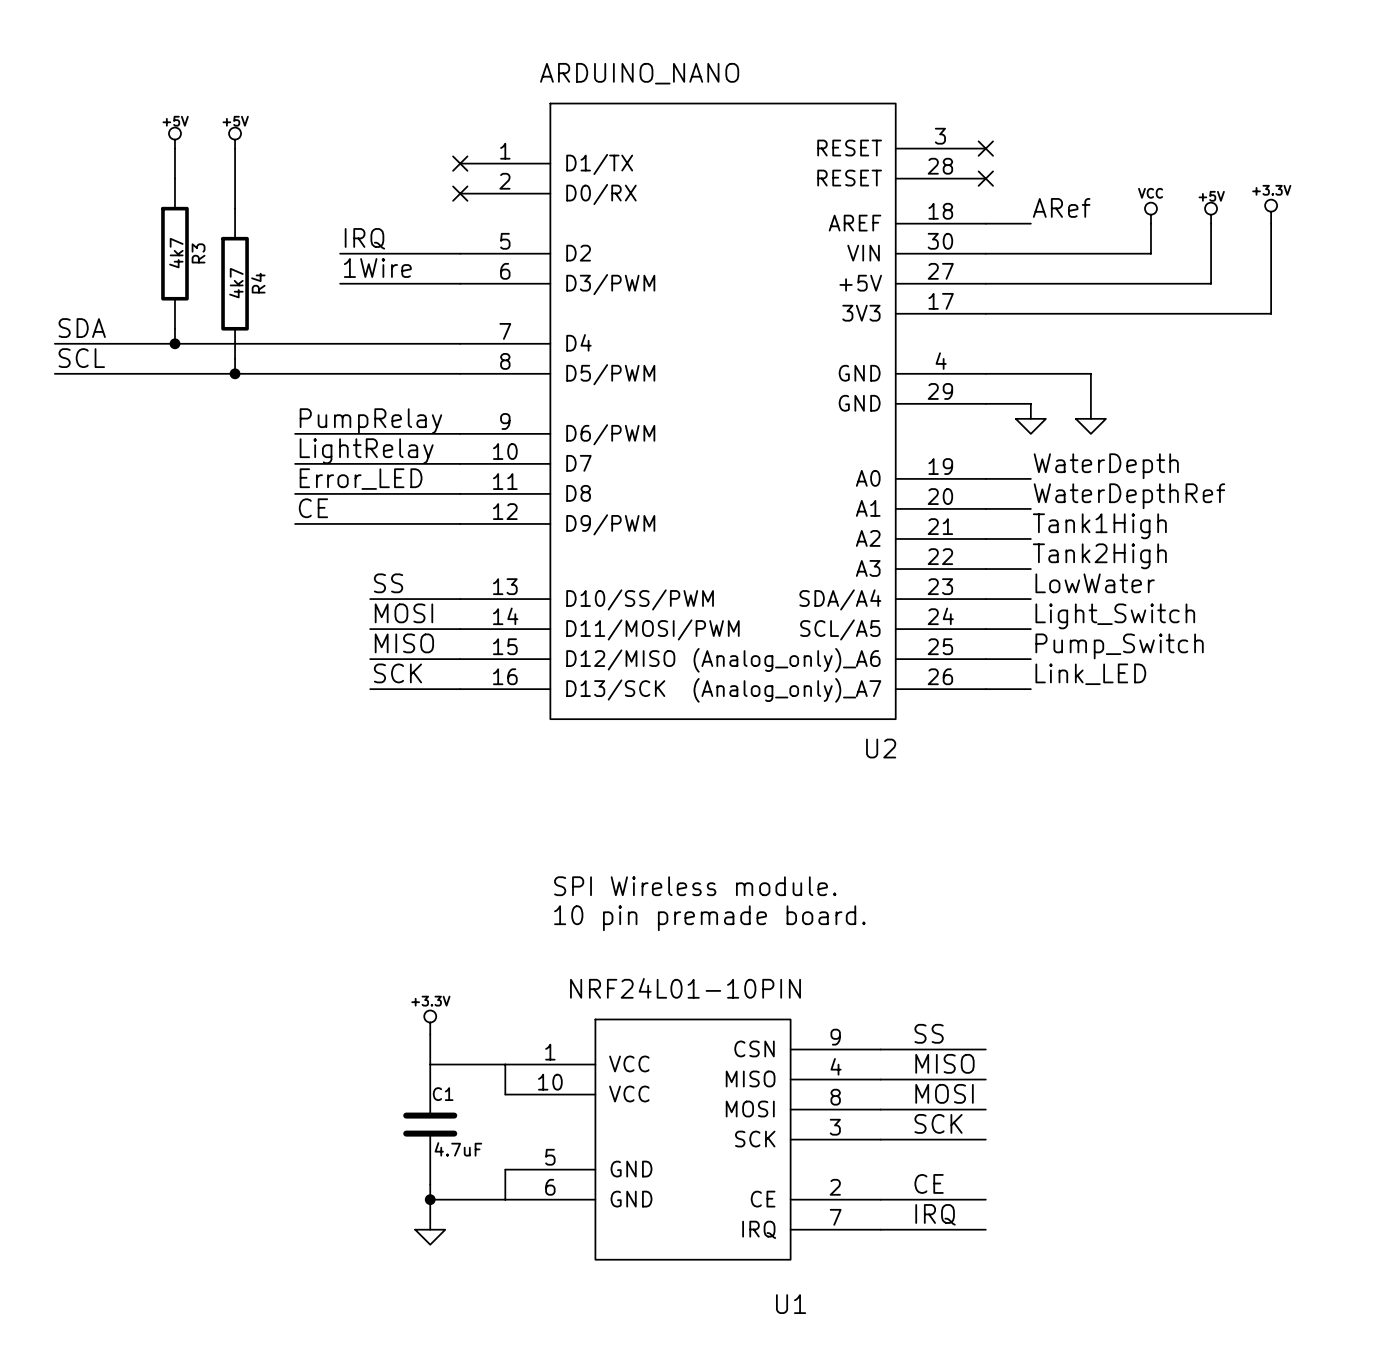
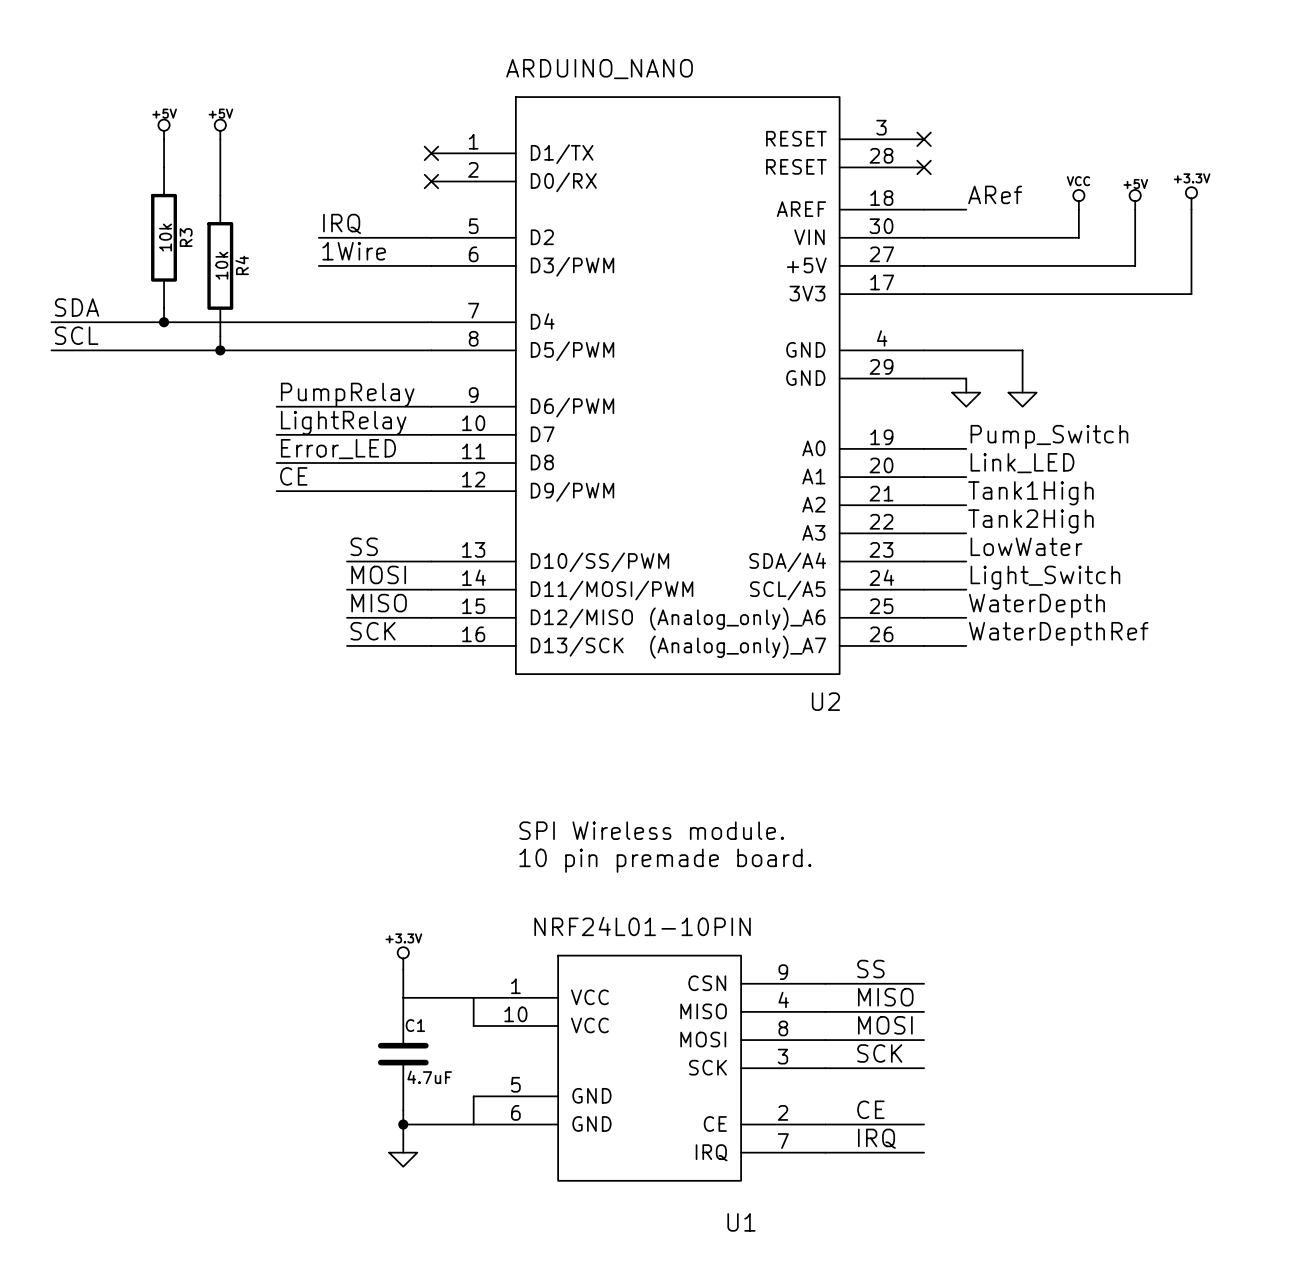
R3 value: 4k7 (176, 253) -> 10k (165, 237)
R4 value: 4k7 (236, 283) -> 10k (221, 265)
label: WaterDepth (1106, 466) -> Pump_Switch (1049, 437)
label: WaterDepthRef (1129, 496) -> Link_LED (1022, 463)
label: Pump_Switch (1119, 646) -> WaterDepth (1036, 605)
label: Link_LED (1090, 674) -> WaterDepthRef (1058, 634)

